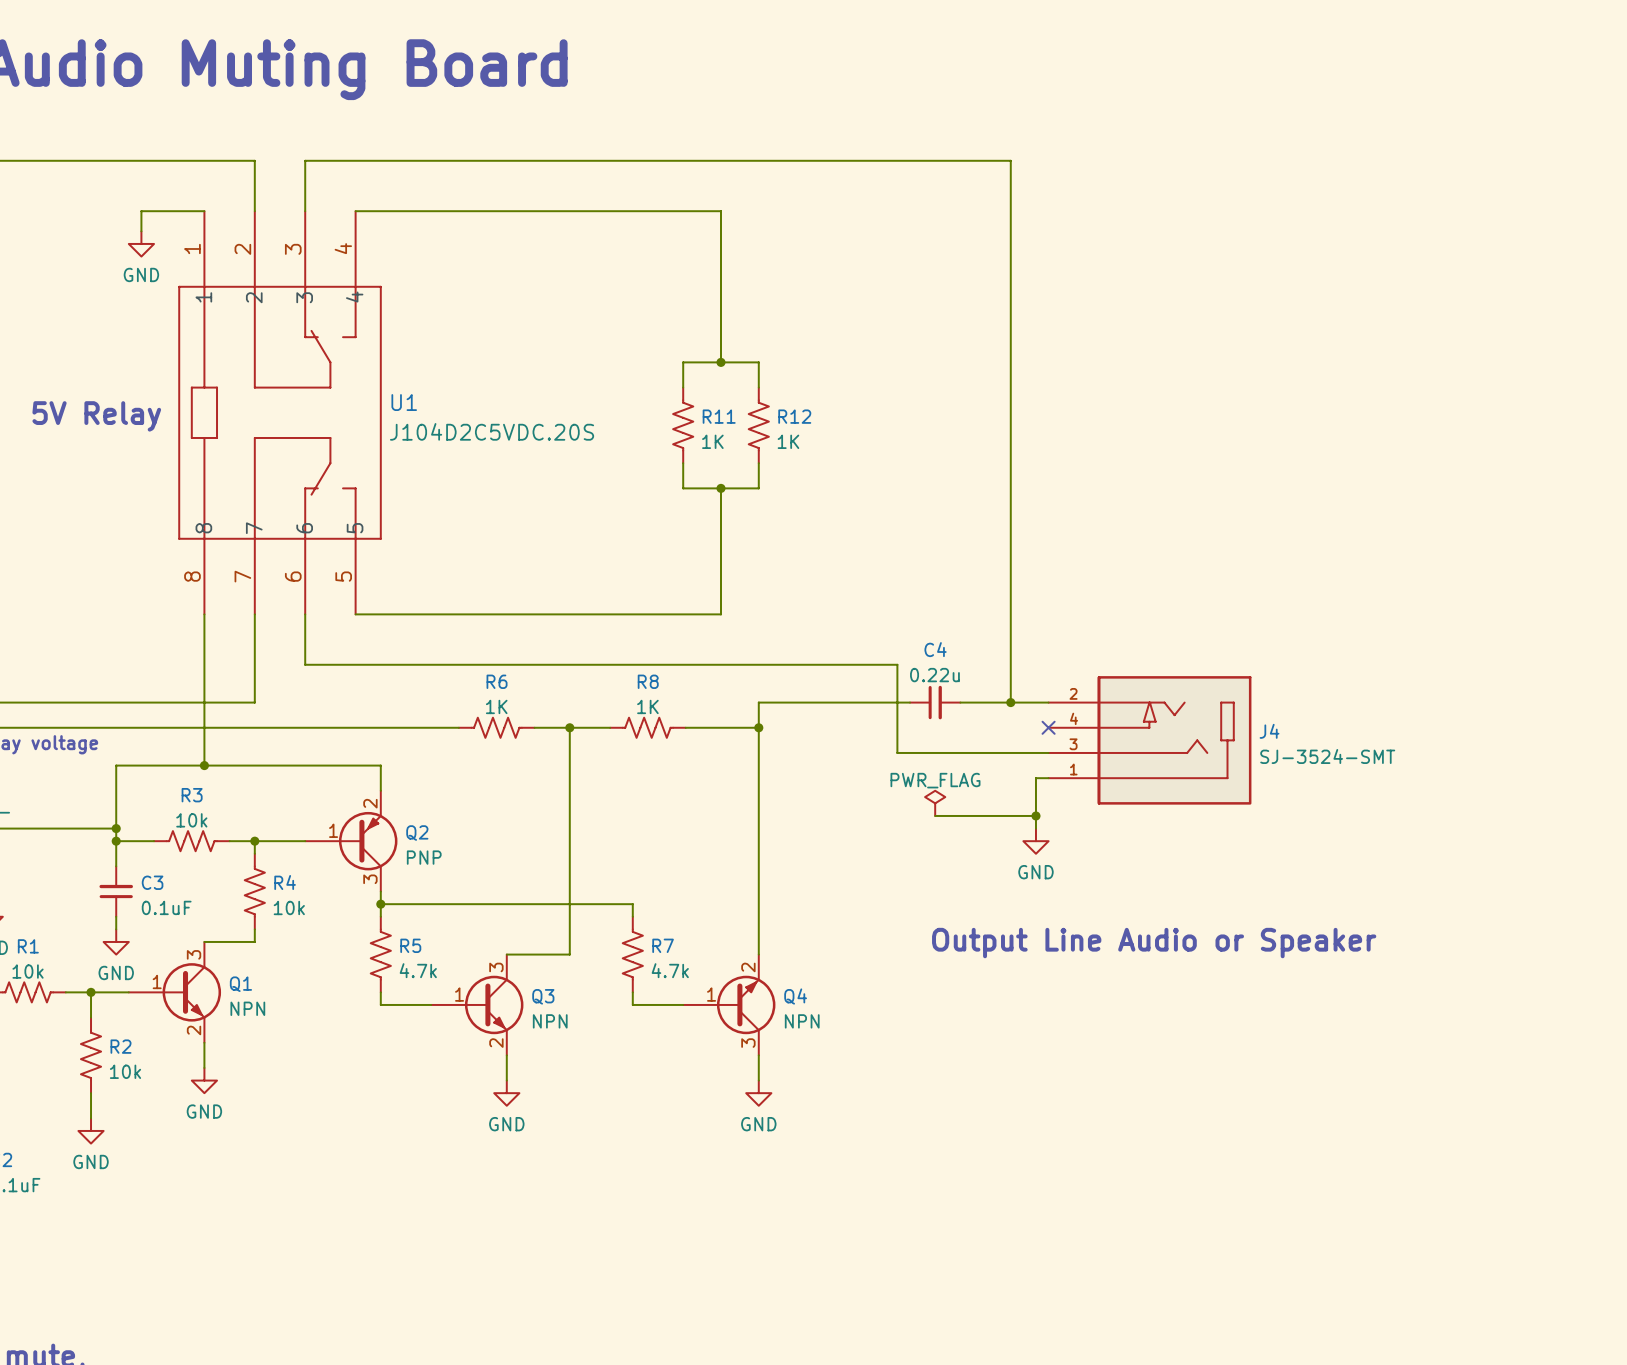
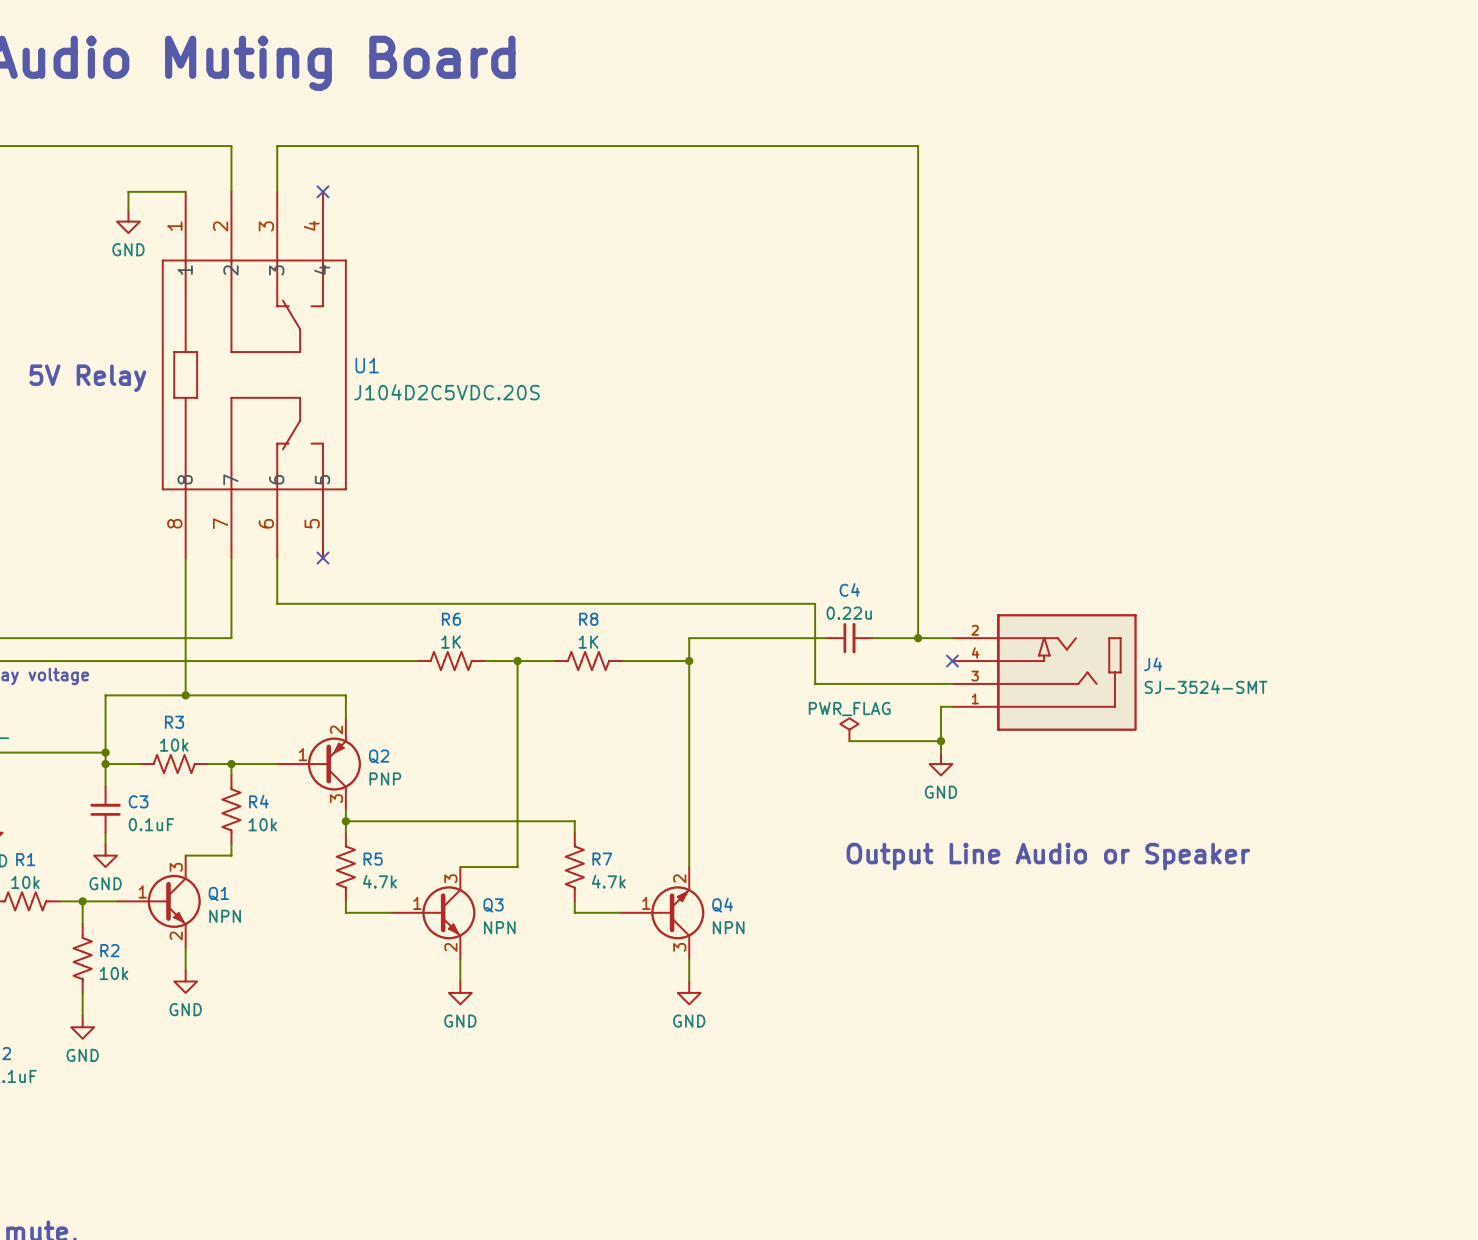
wire: (355, 211) (720, 211) (720, 362) -> none
no-connect mark: none -> (323, 191)
junction: (720, 362) -> none
wire: (683, 387) (683, 362) (758, 362) (758, 387) -> none
R11: 1K (683, 425) -> none
R12: 1K (758, 425) -> none
wire: (683, 463) (683, 488) (758, 488) (758, 463) -> none
wire: (720, 488) (720, 614) (355, 614) -> none
junction: (720, 488) -> none
no-connect mark: none -> (323, 558)

